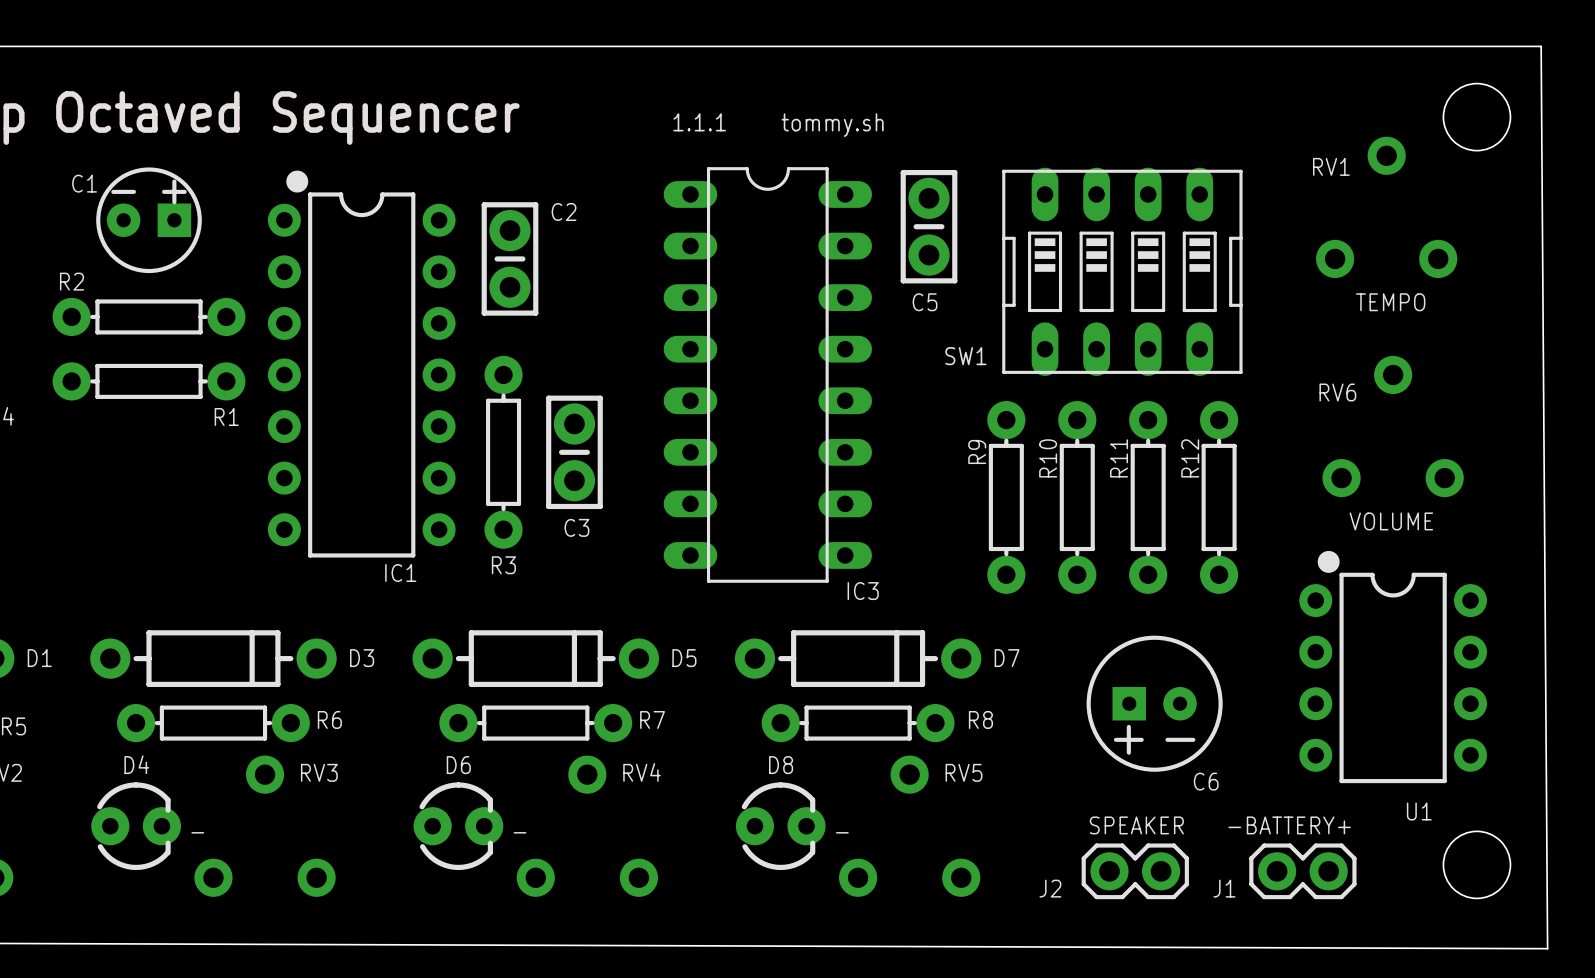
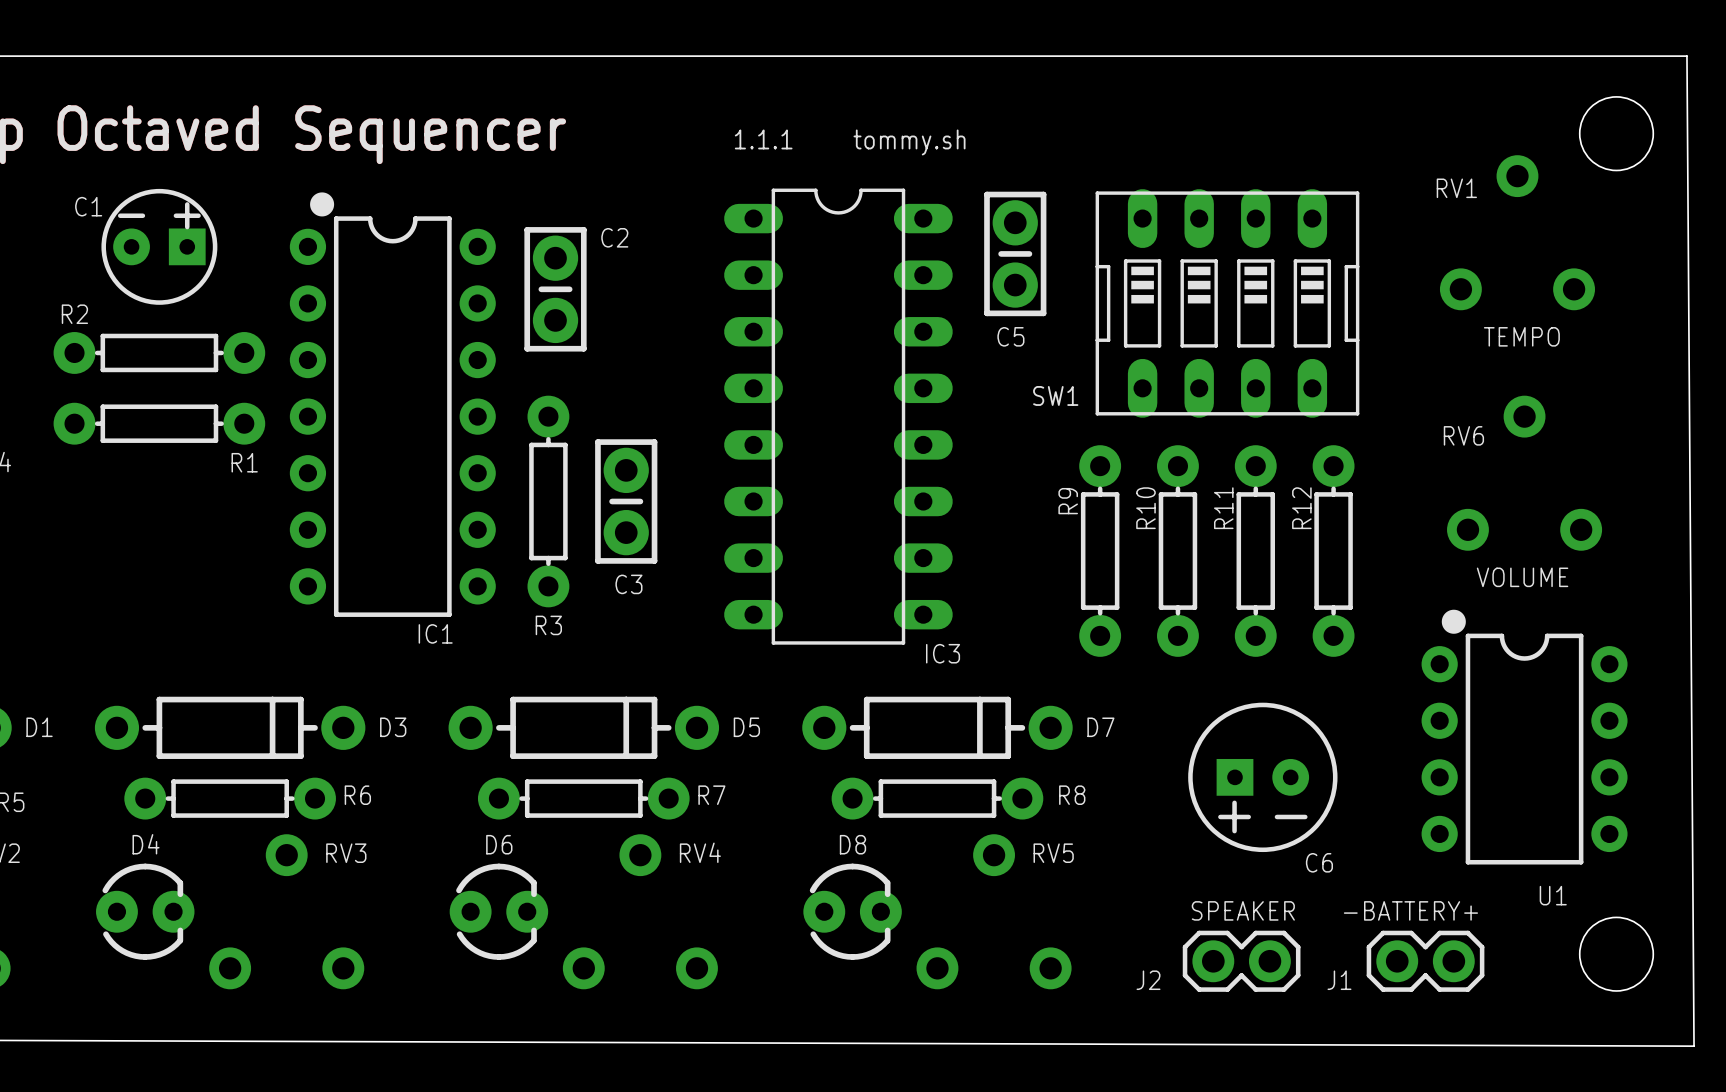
text: - (197, 832) -> none
text: - (520, 832) -> none
text: - (842, 832) -> none

